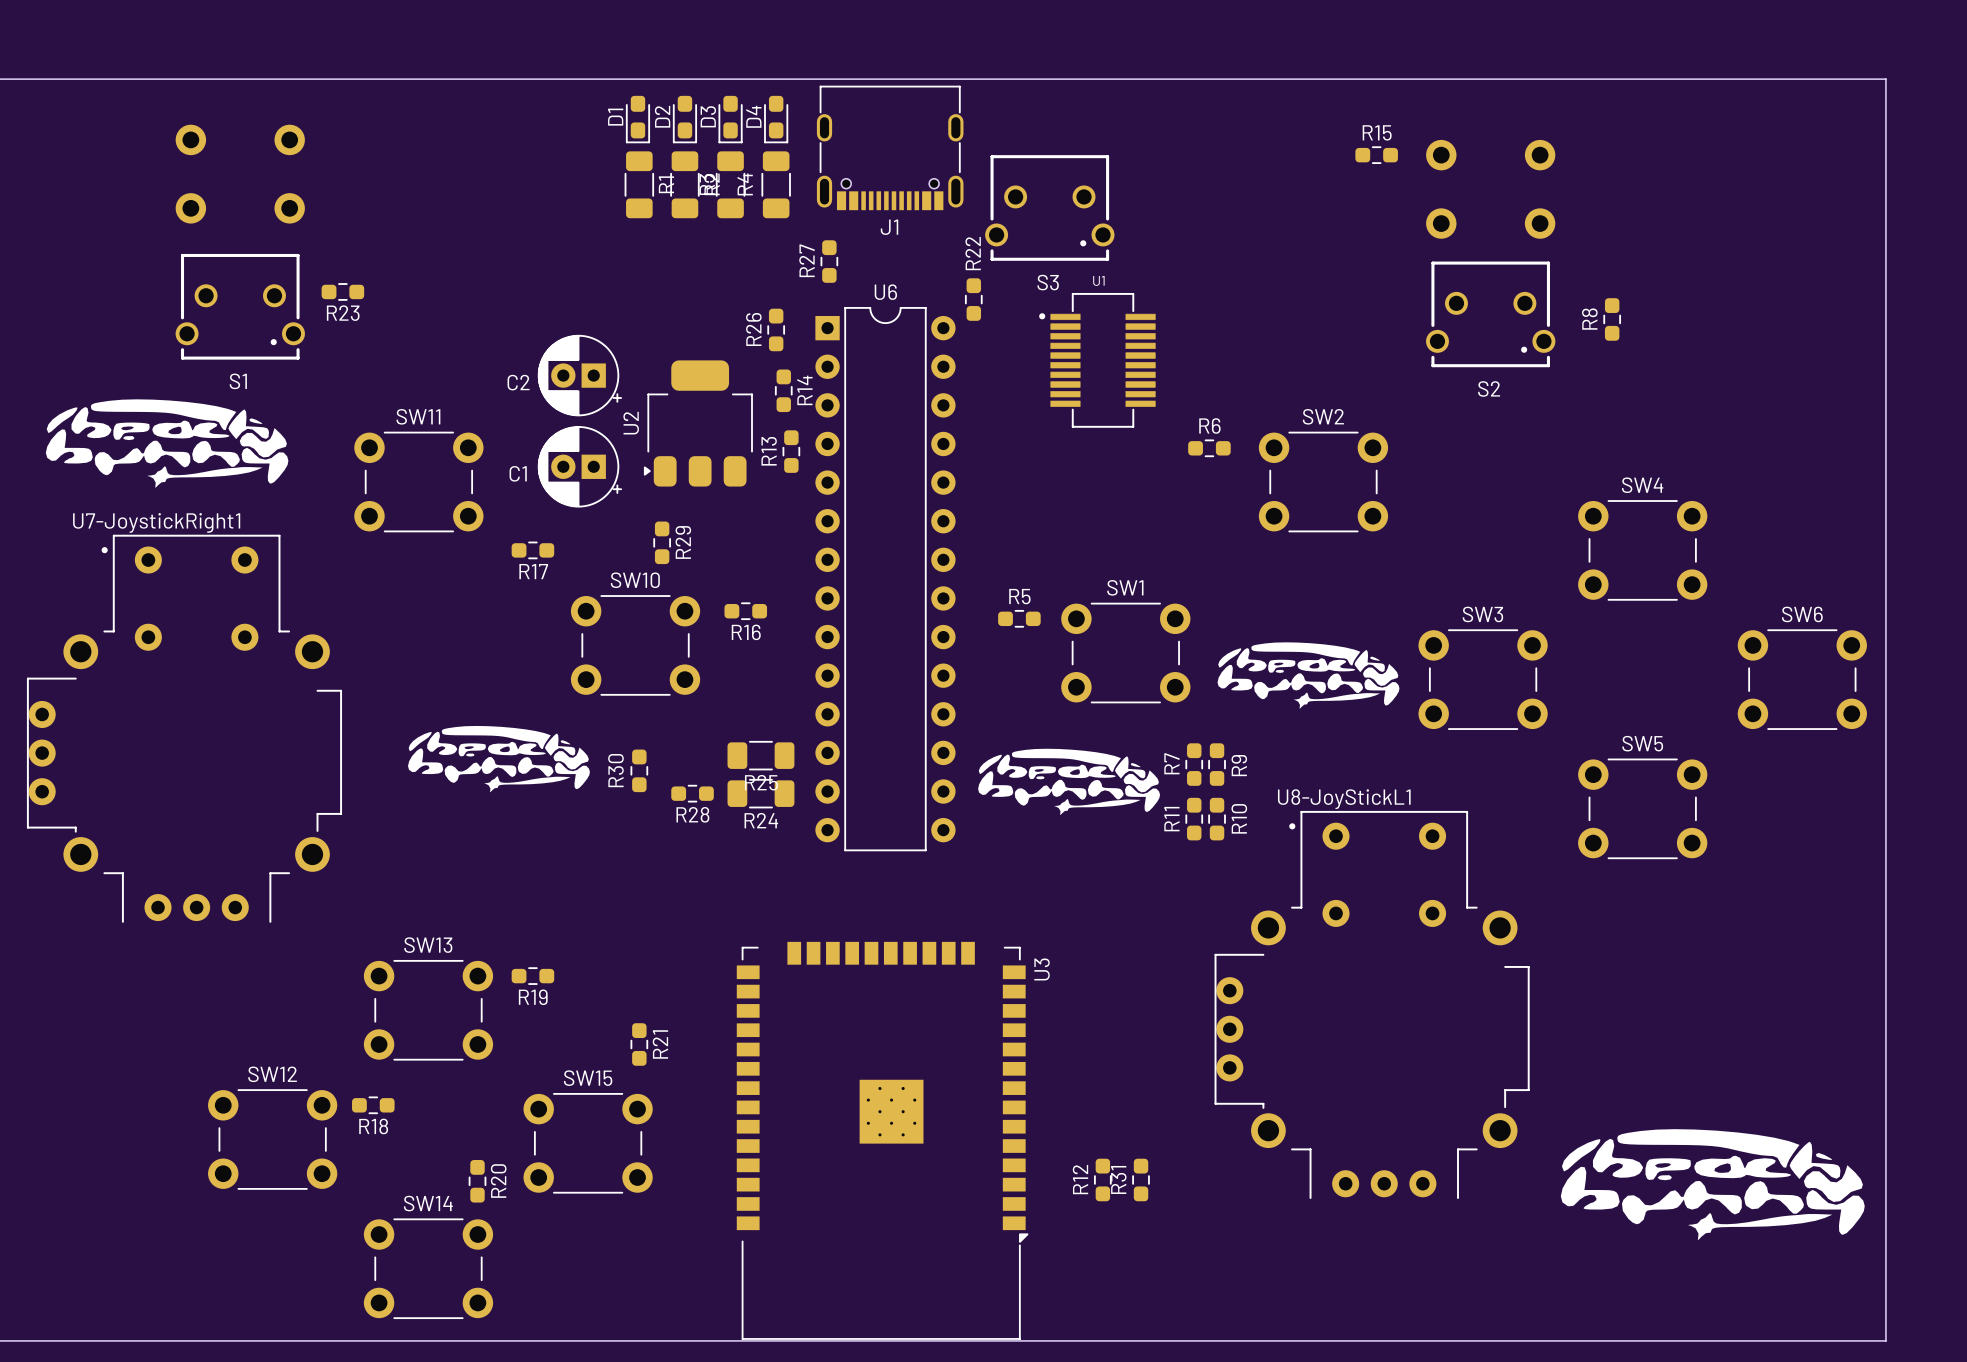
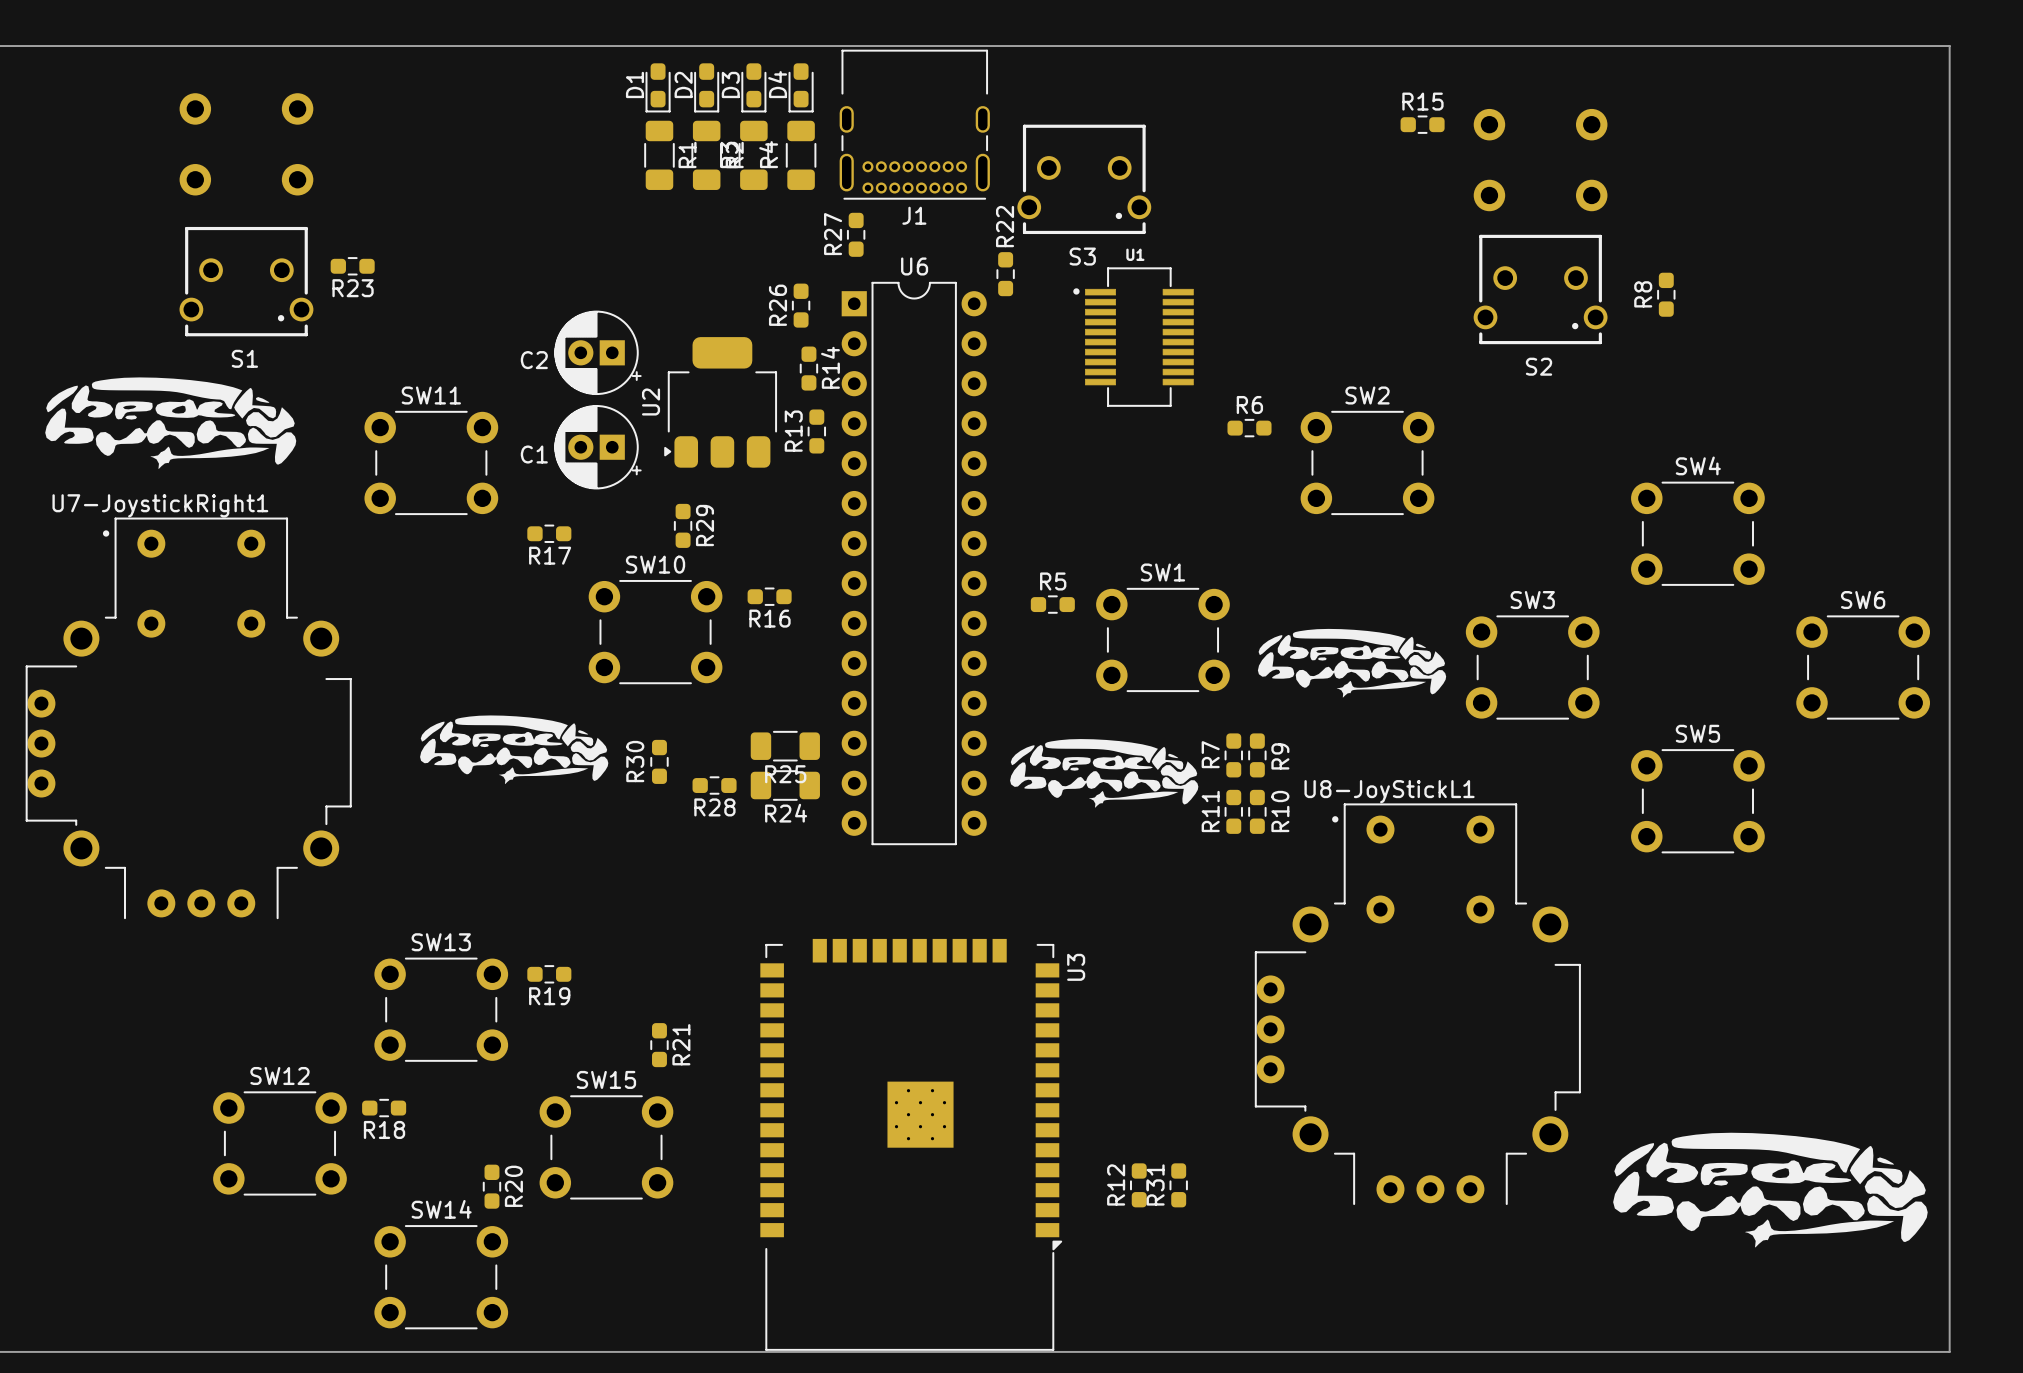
J1 footprint: [816, 85, 964, 211] -> [839, 49, 990, 200]

